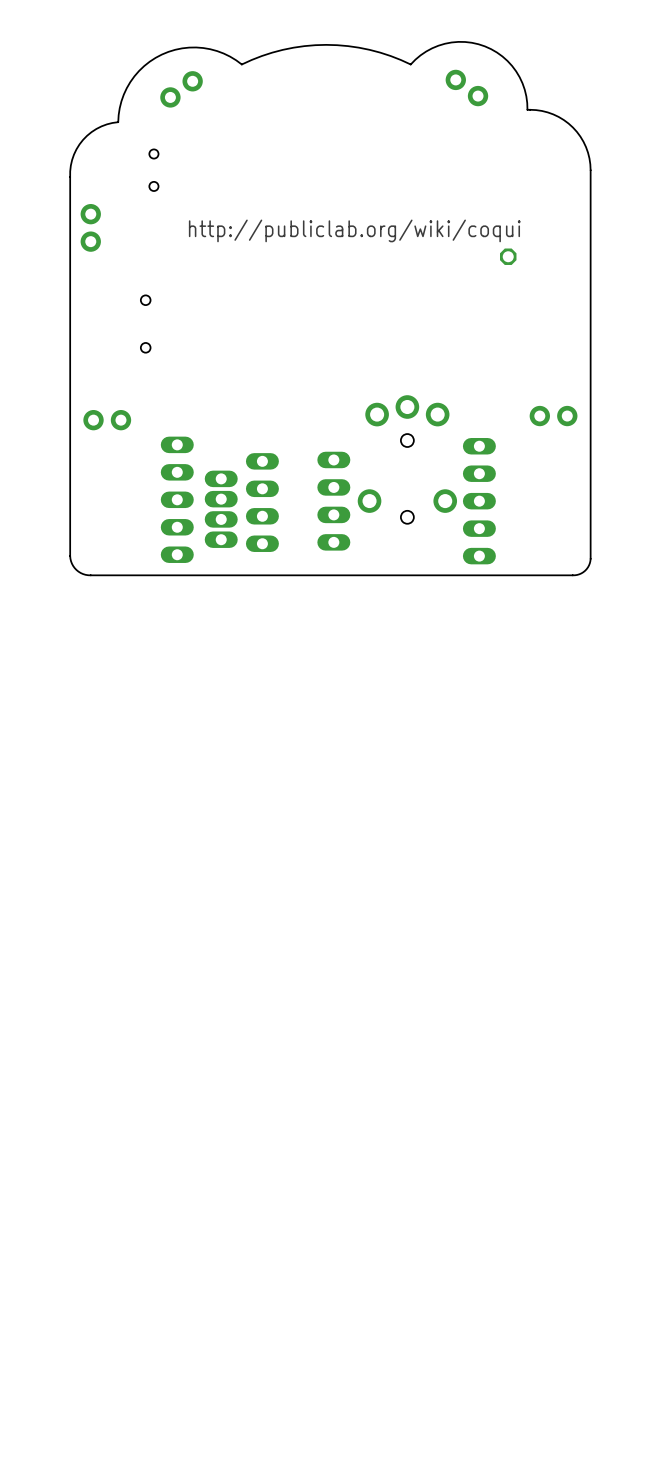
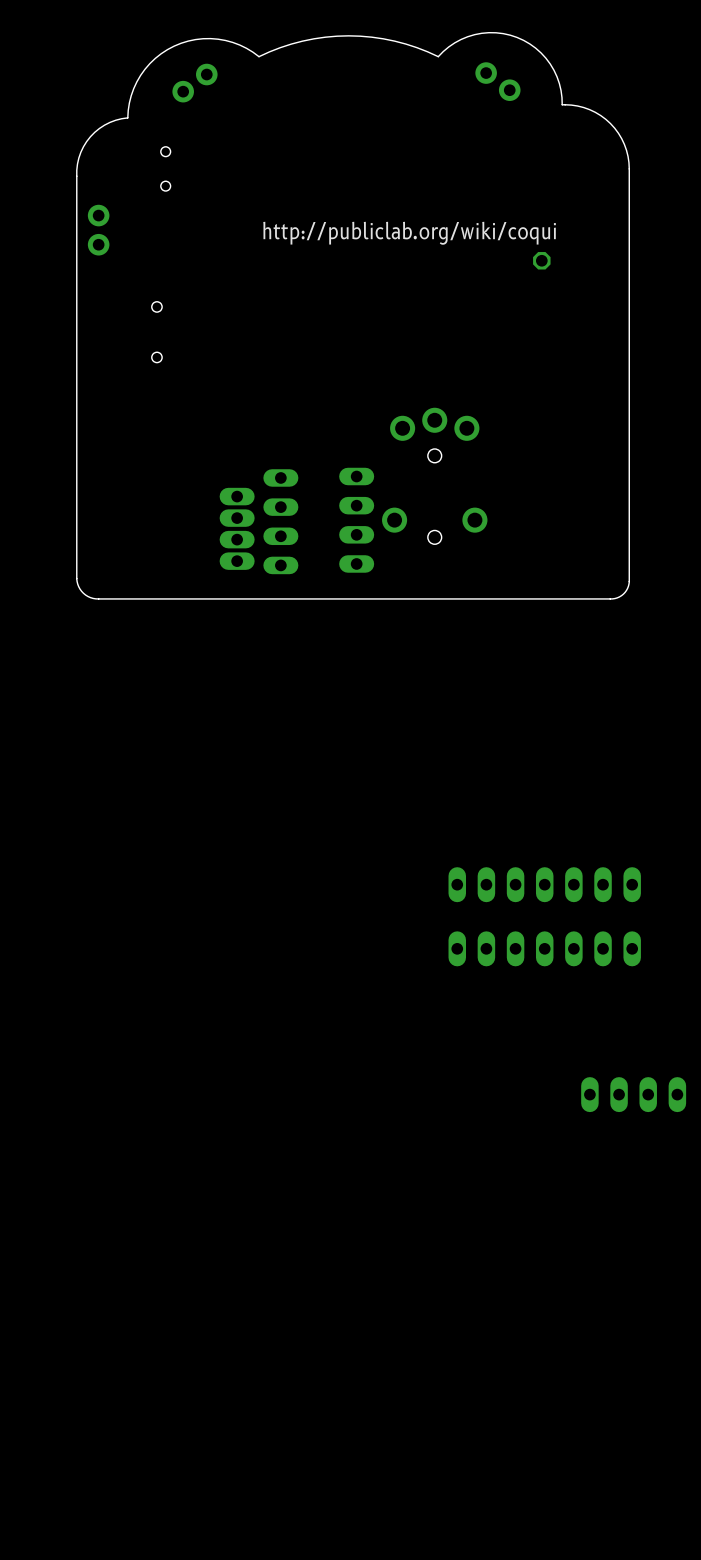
part: (553, 416) -> none
part: (107, 420) -> none
part: (177, 499) -> none
part: (479, 501) -> none
part: none -> (544, 884)
part: none -> (544, 948)
part: none -> (633, 1094)

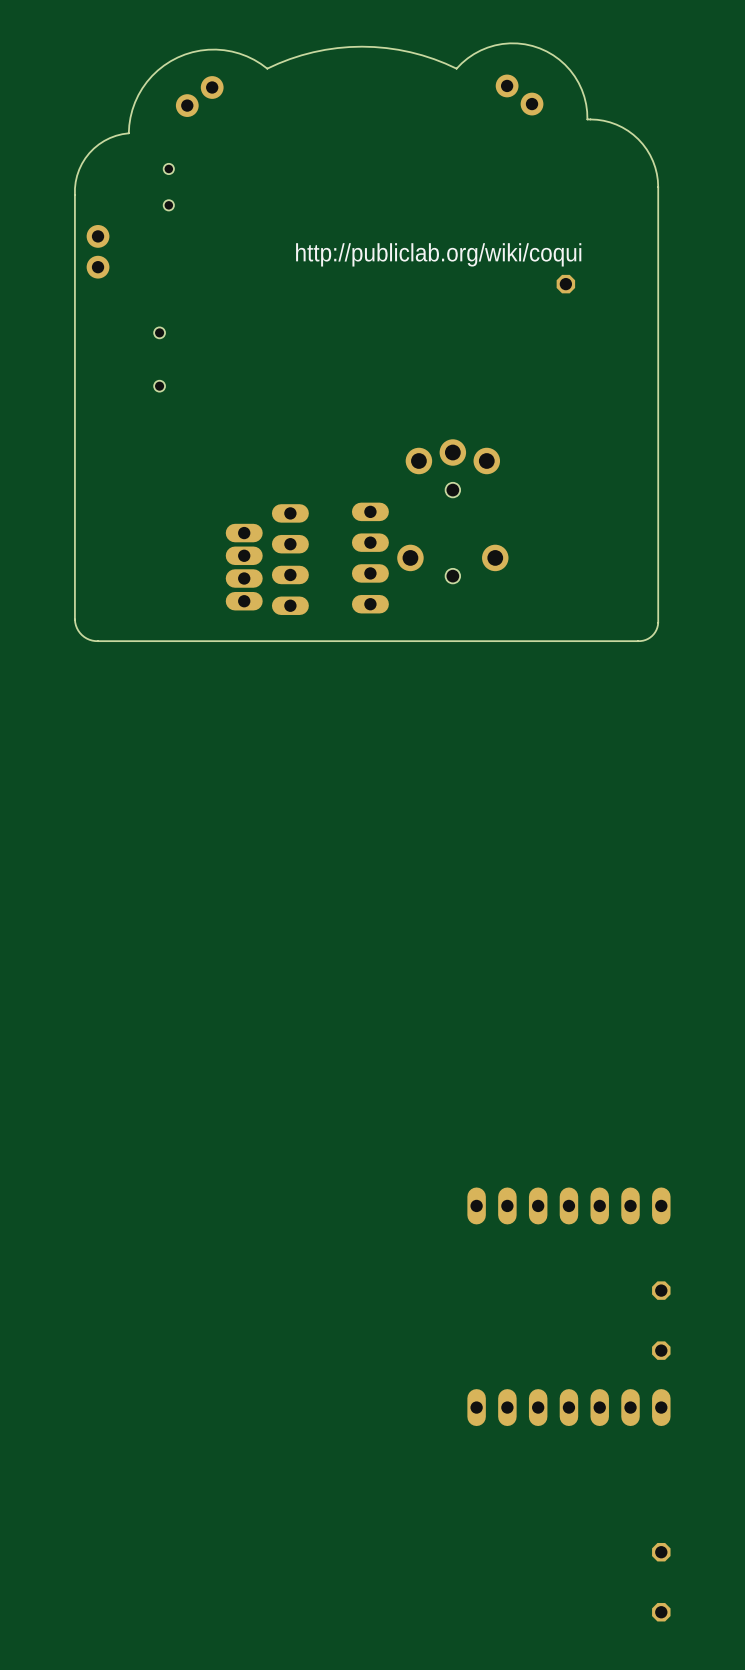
part: (544, 884) -> none
part: (544, 948) -> none
part: (633, 1094) -> none
part: none -> (568, 1205)
part: none -> (661, 1290)
part: none -> (661, 1350)
part: none -> (568, 1407)
part: none -> (661, 1552)
part: none -> (661, 1612)

